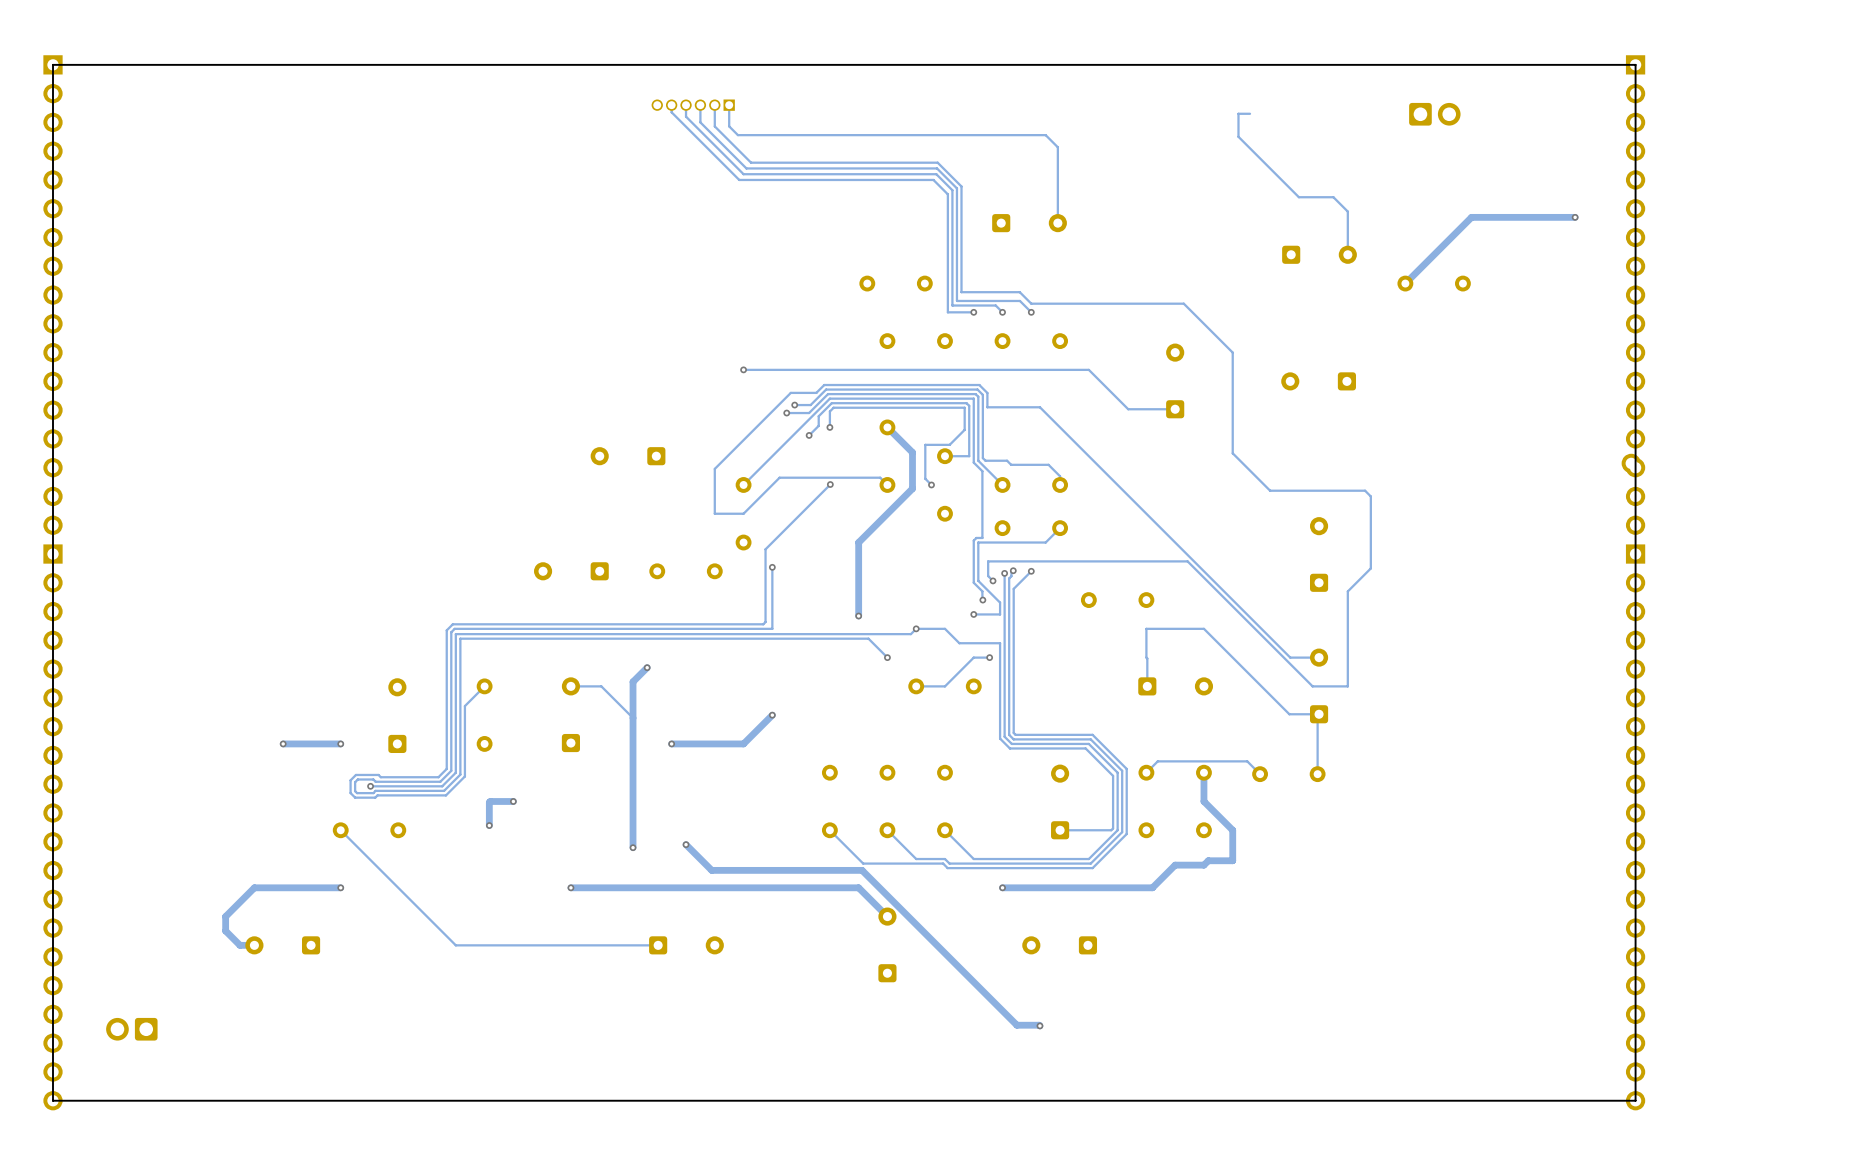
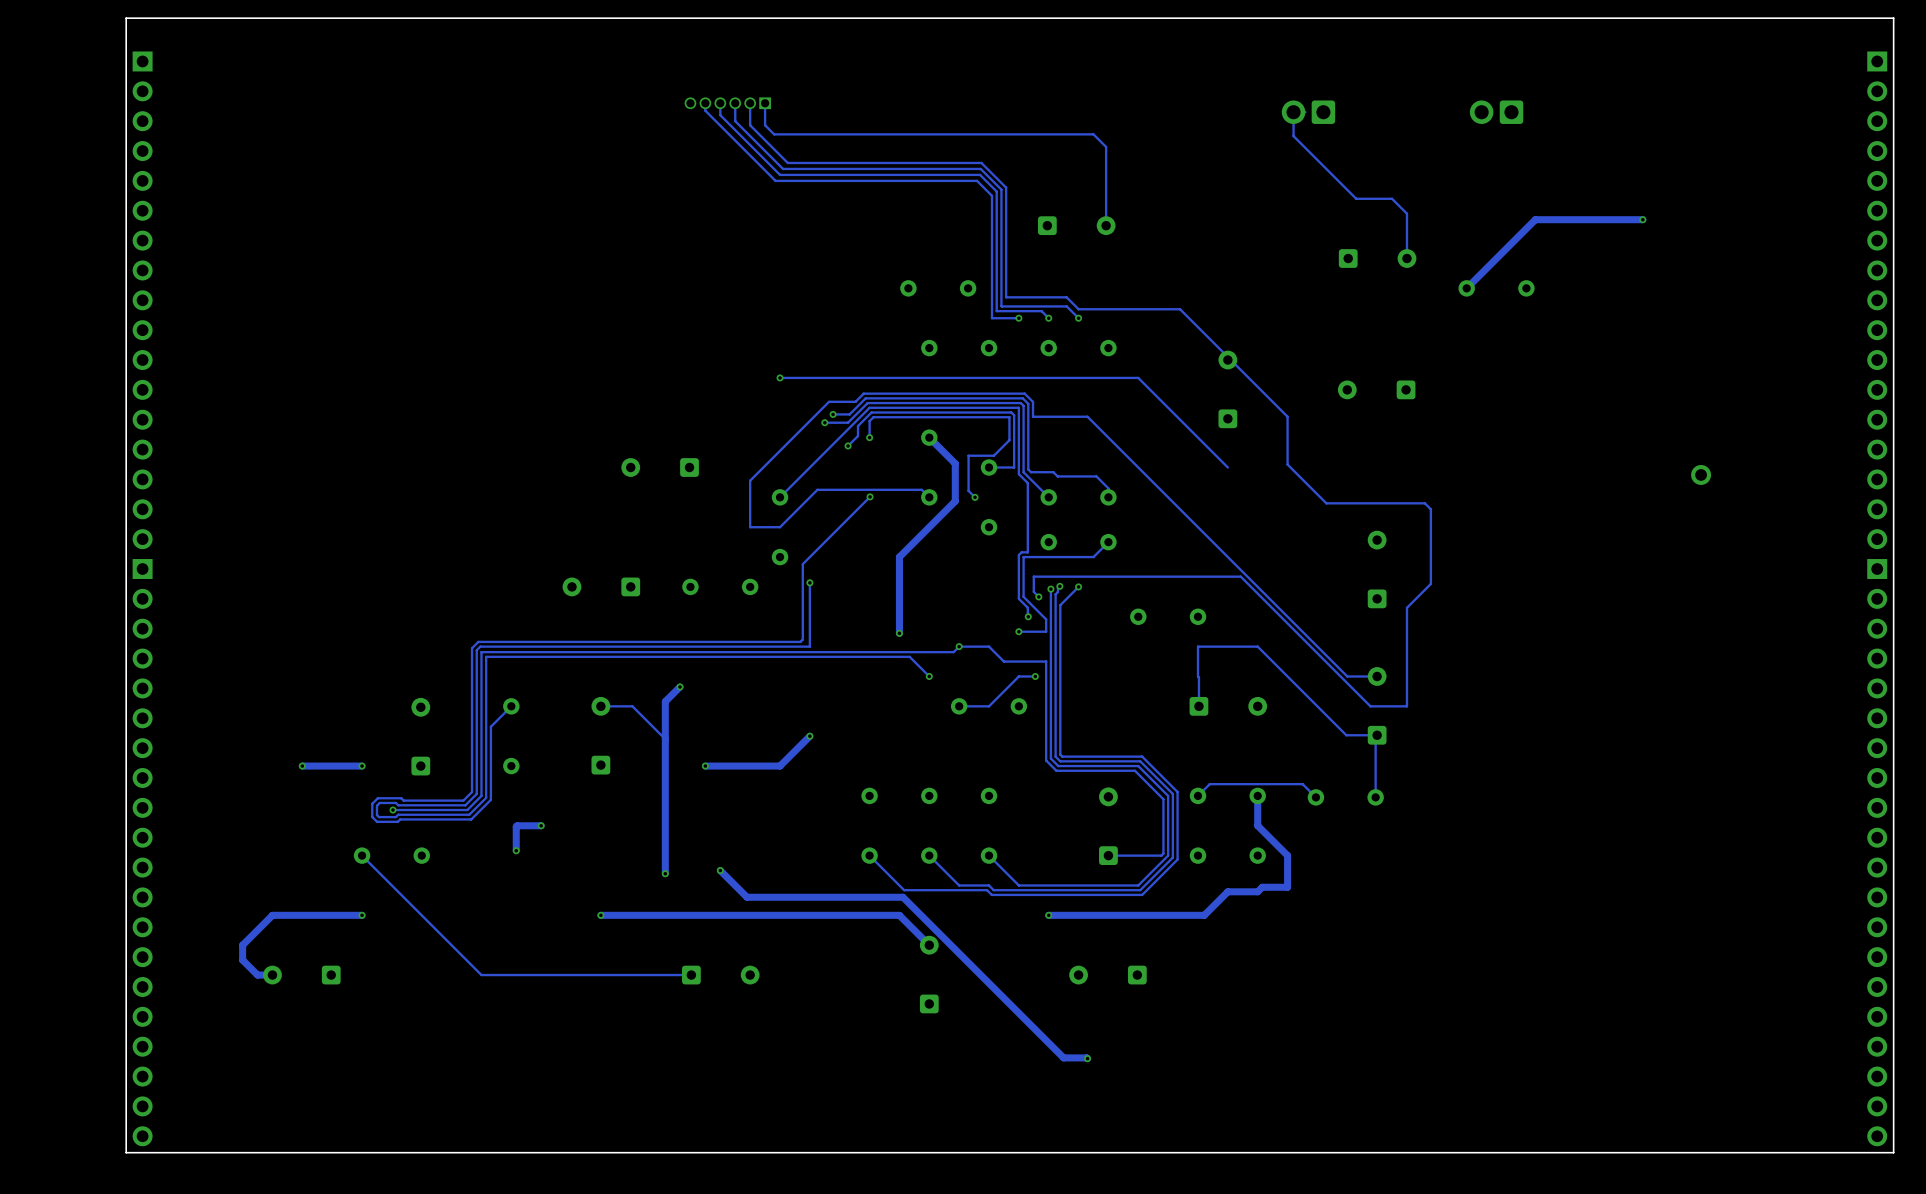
board edge: (1635, 64) (53, 64) (53, 1100) (1635, 1100) (1635, 64) -> (1893, 18) (1893, 1152) (126, 1152) (126, 18) (1893, 18)
part: none -> (1308, 112)
part rotation: 0° (1434, 114) -> 180° (1496, 112)
part position: (53, 295) -> (142, 300)
part position: (1635, 295) -> (1877, 300)
track: (1129, 303) (1183, 303) (1232, 352) (1232, 407) -> (1180, 309) (1287, 416)
track: (1175, 409) (1128, 409) -> (1227, 467) (1179, 418)
part position: (53, 827) -> (142, 852)
part position: (1635, 827) -> (1877, 852)
part: (131, 1029) -> none

